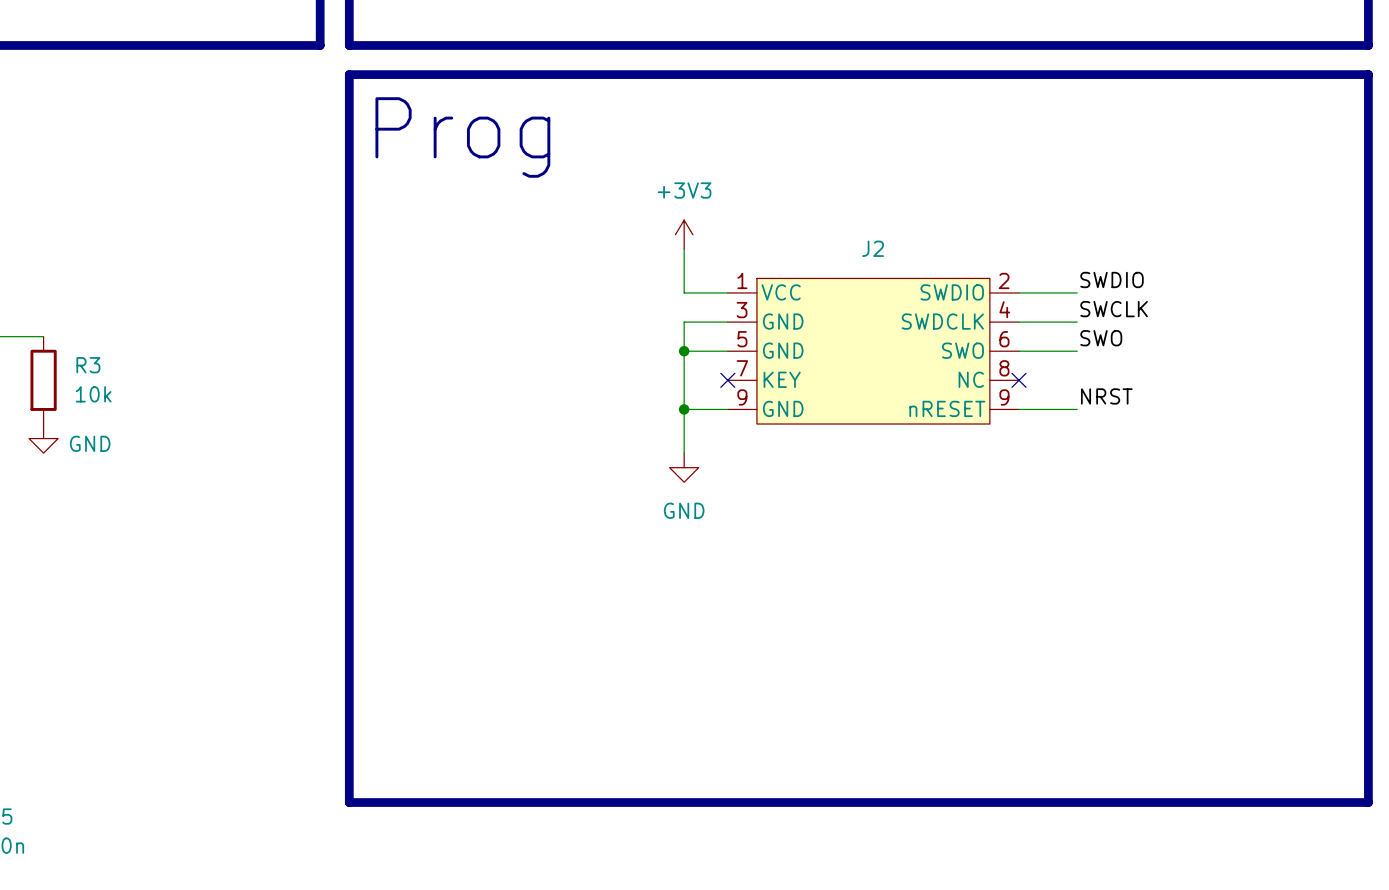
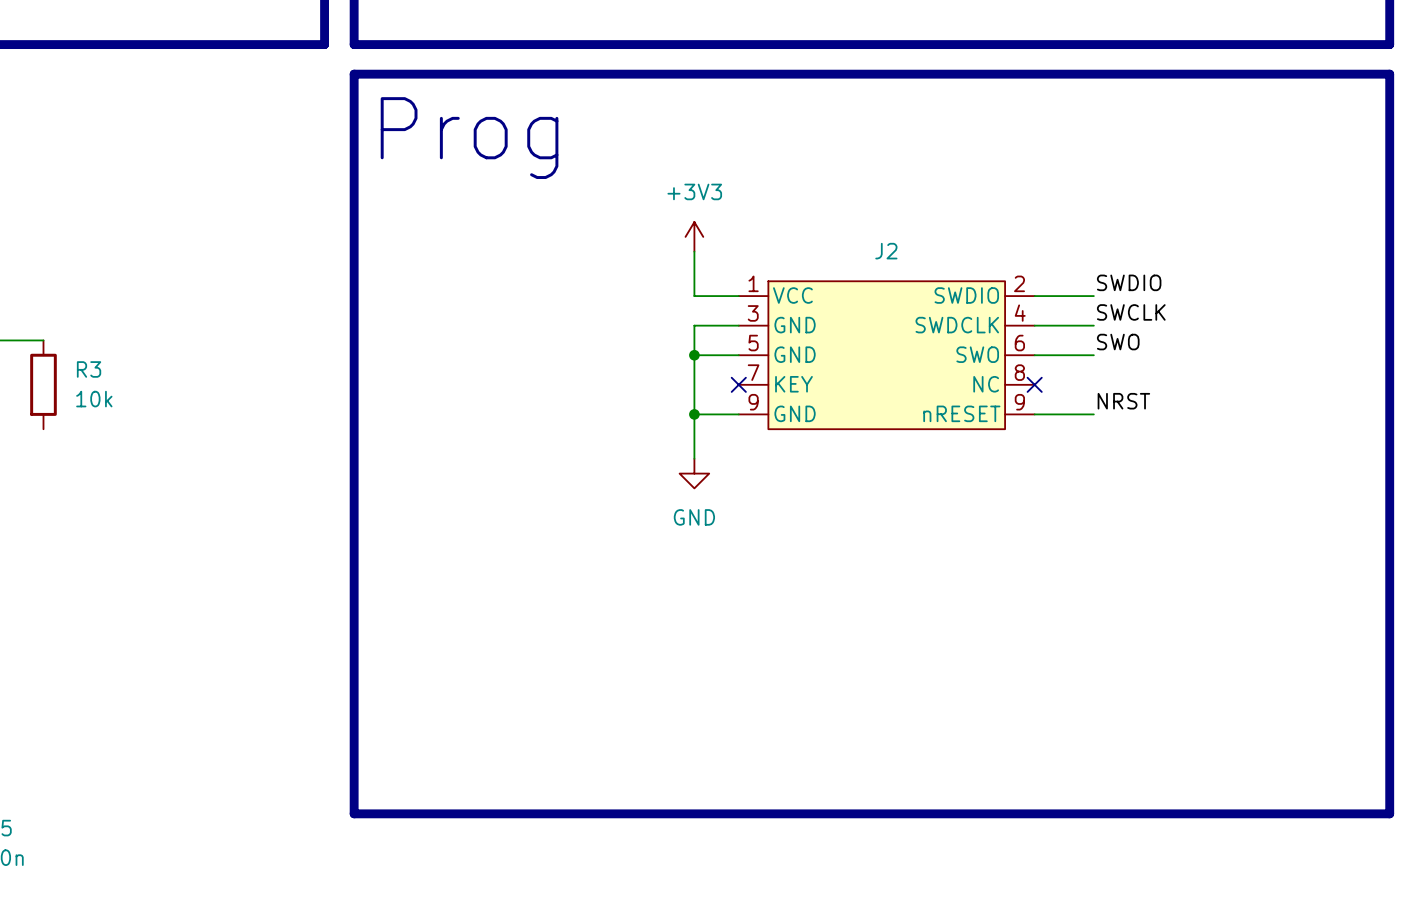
power symbol: GND (43, 438) -> none

